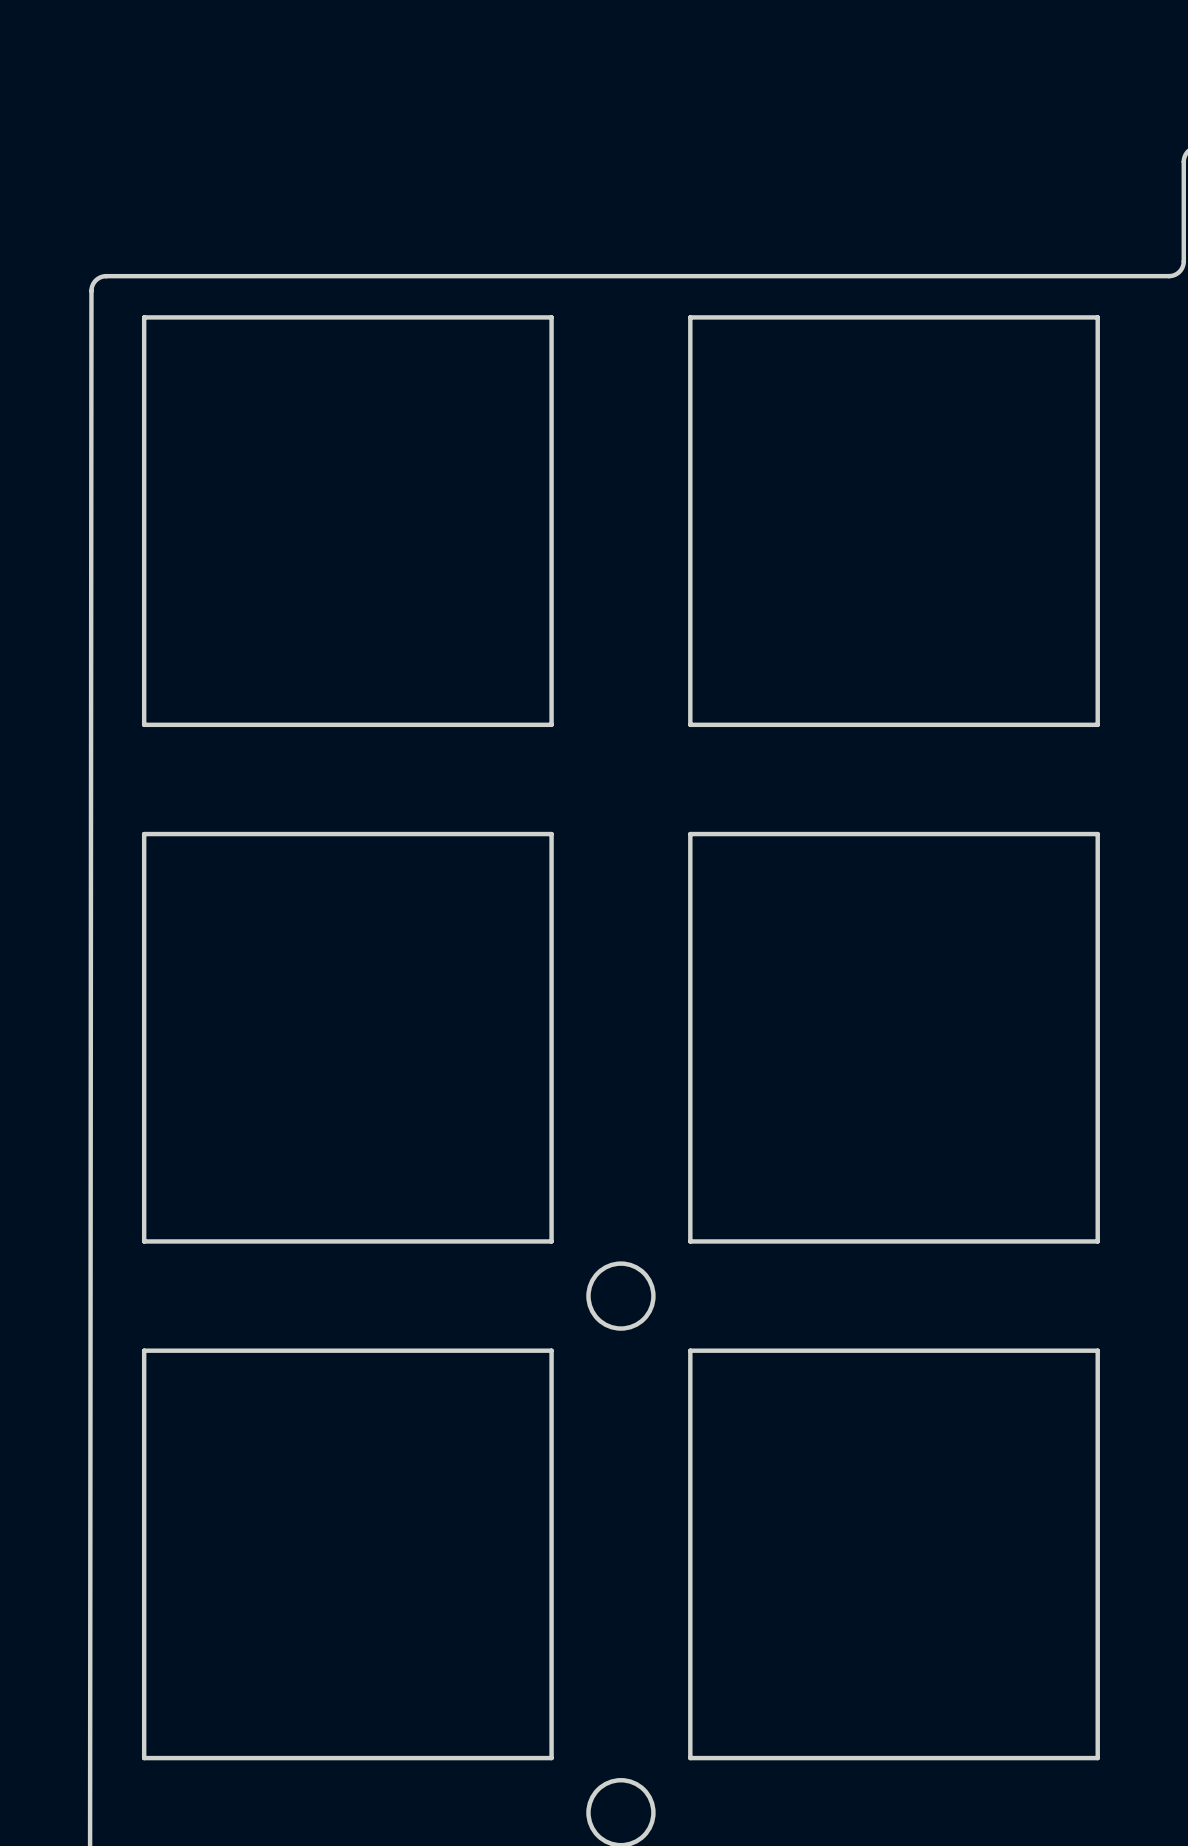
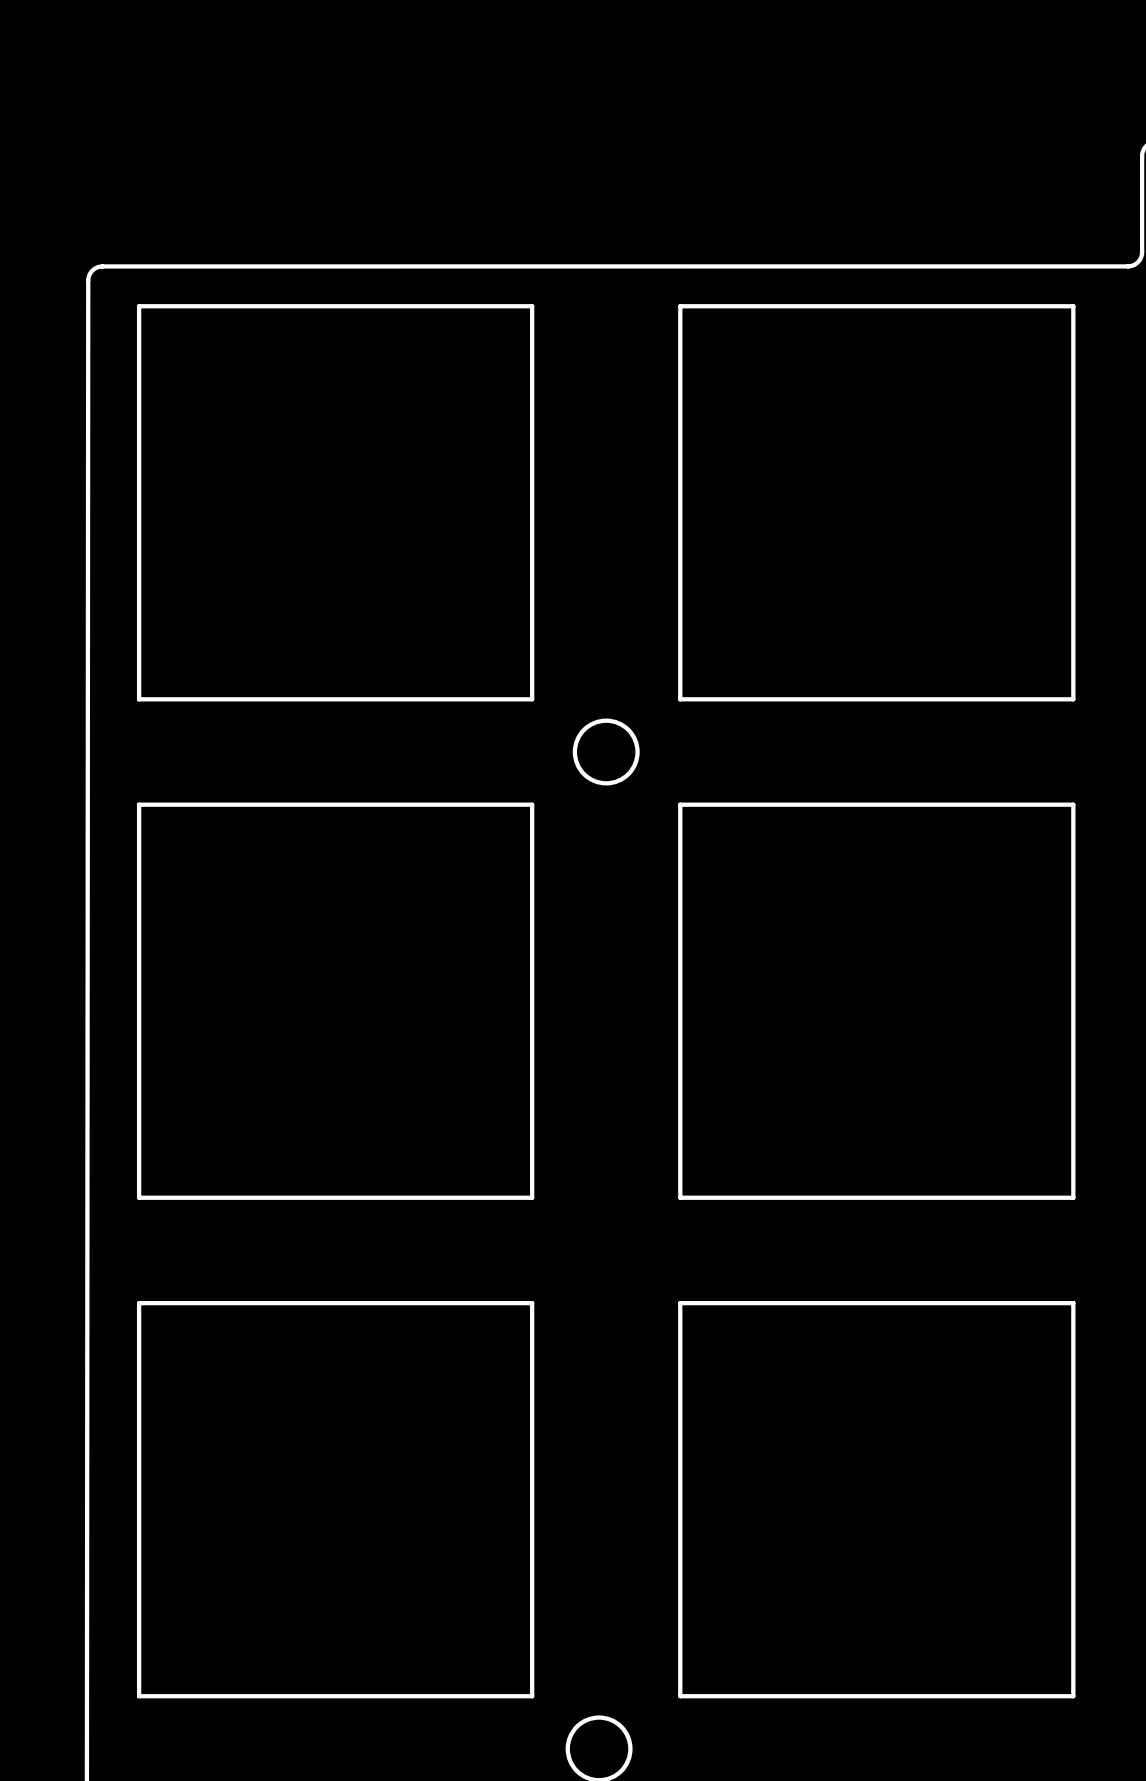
board edge: (705, 317) (690, 317) (690, 724) (705, 724) -> (680, 306) (680, 699)
board edge: (1097, 317) (1097, 724) -> (1059, 306) (1073, 306) (1073, 699) (1059, 699)
board edge: (705, 834) (690, 834) (690, 1241) (705, 1241) -> (680, 804) (680, 1197)
board edge: (1097, 834) (1097, 1241) -> (1059, 804) (1073, 804) (1073, 1197) (1059, 1197)
round board edge position: (620, 1296) -> (606, 752)
board edge: (705, 1350) (690, 1350) (690, 1758) (705, 1758) -> (680, 1303) (680, 1696)
board edge: (1097, 1350) (1097, 1758) -> (1059, 1303) (1073, 1303) (1073, 1696) (1059, 1696)

